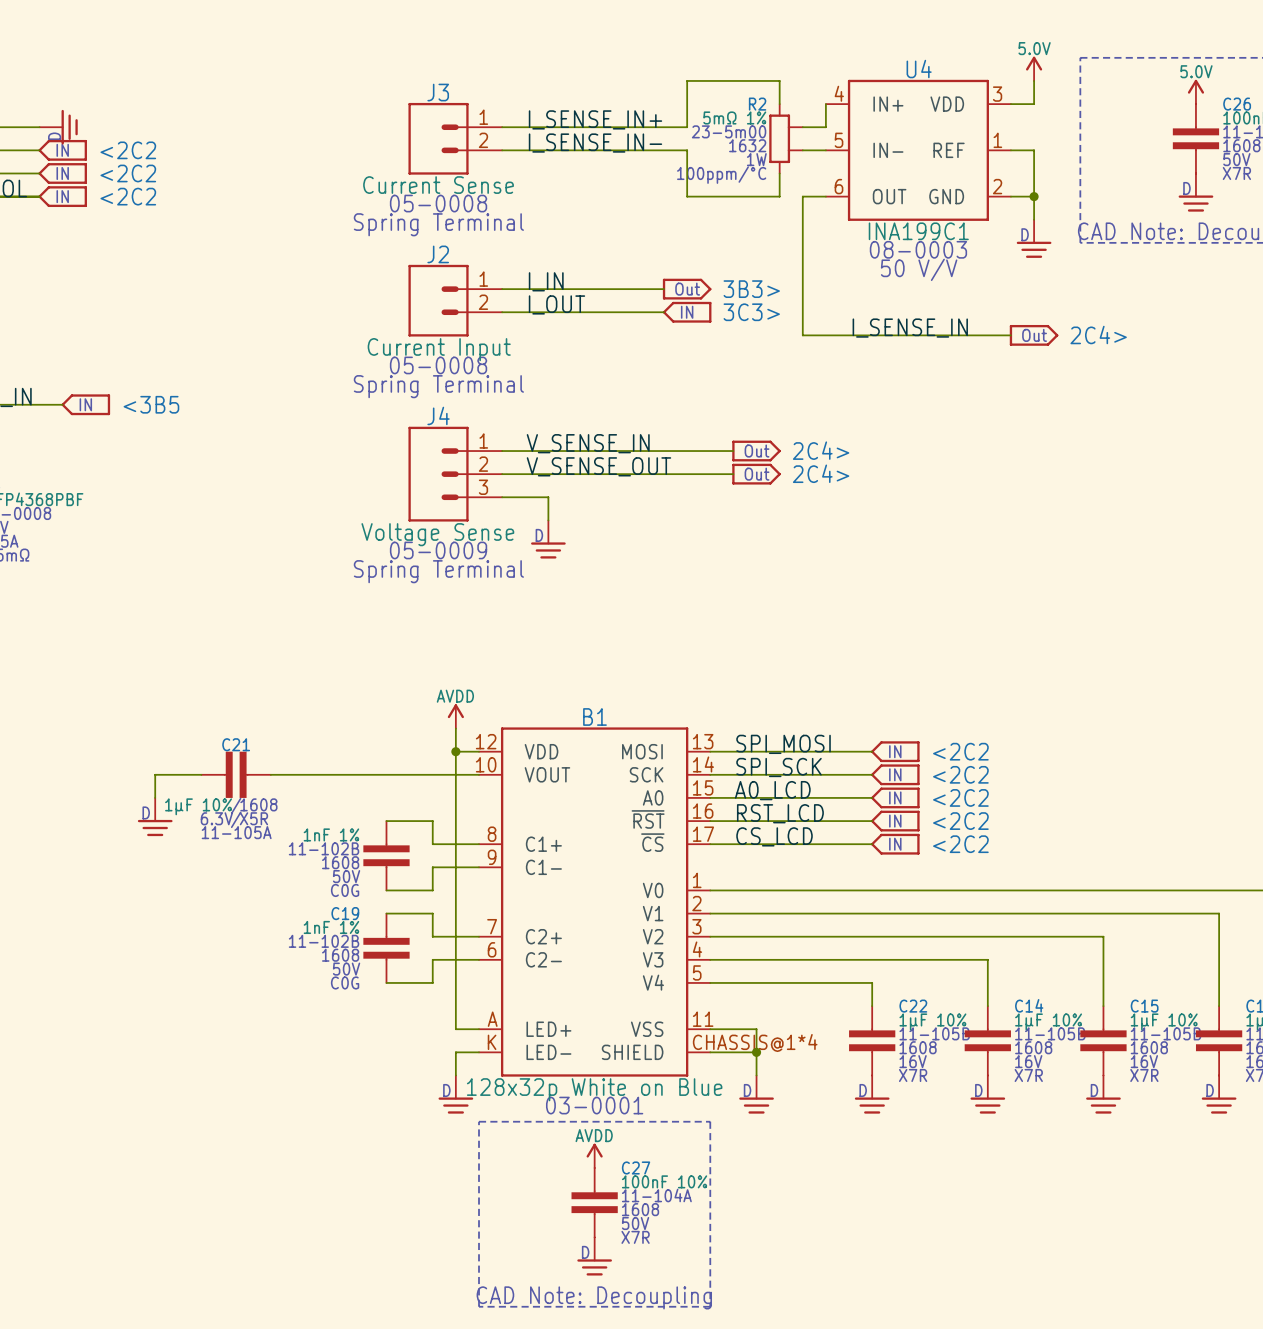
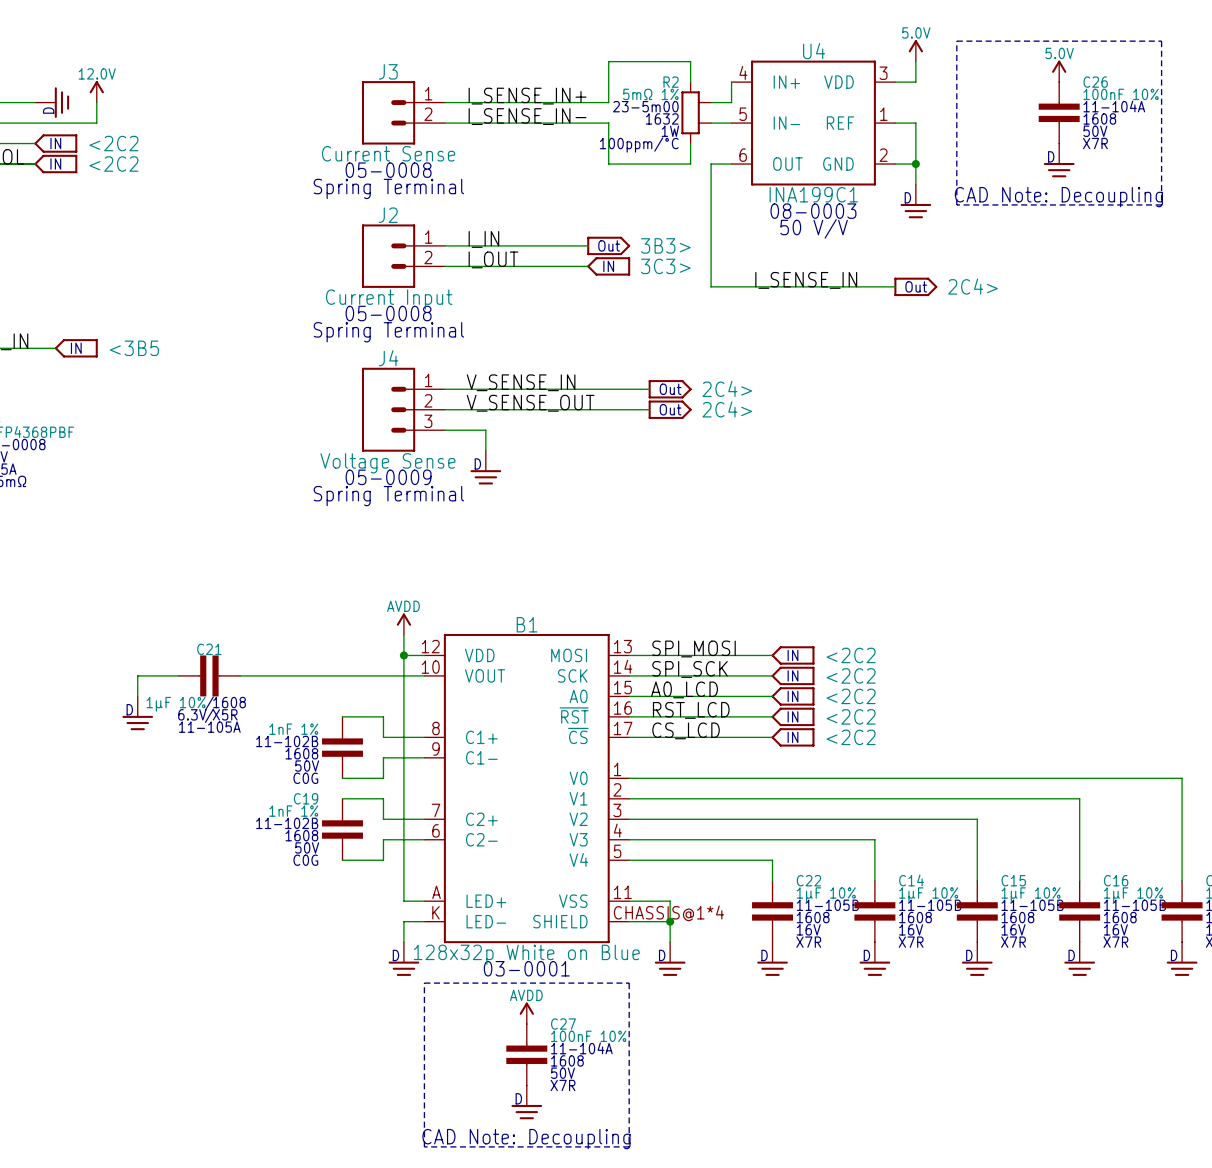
power symbol: none -> 12.0V (96, 91)
wire: none -> (96, 102) (96, 123) (35, 123)
part: (62, 150) -> none
text: <2C2 (128, 150) -> none

